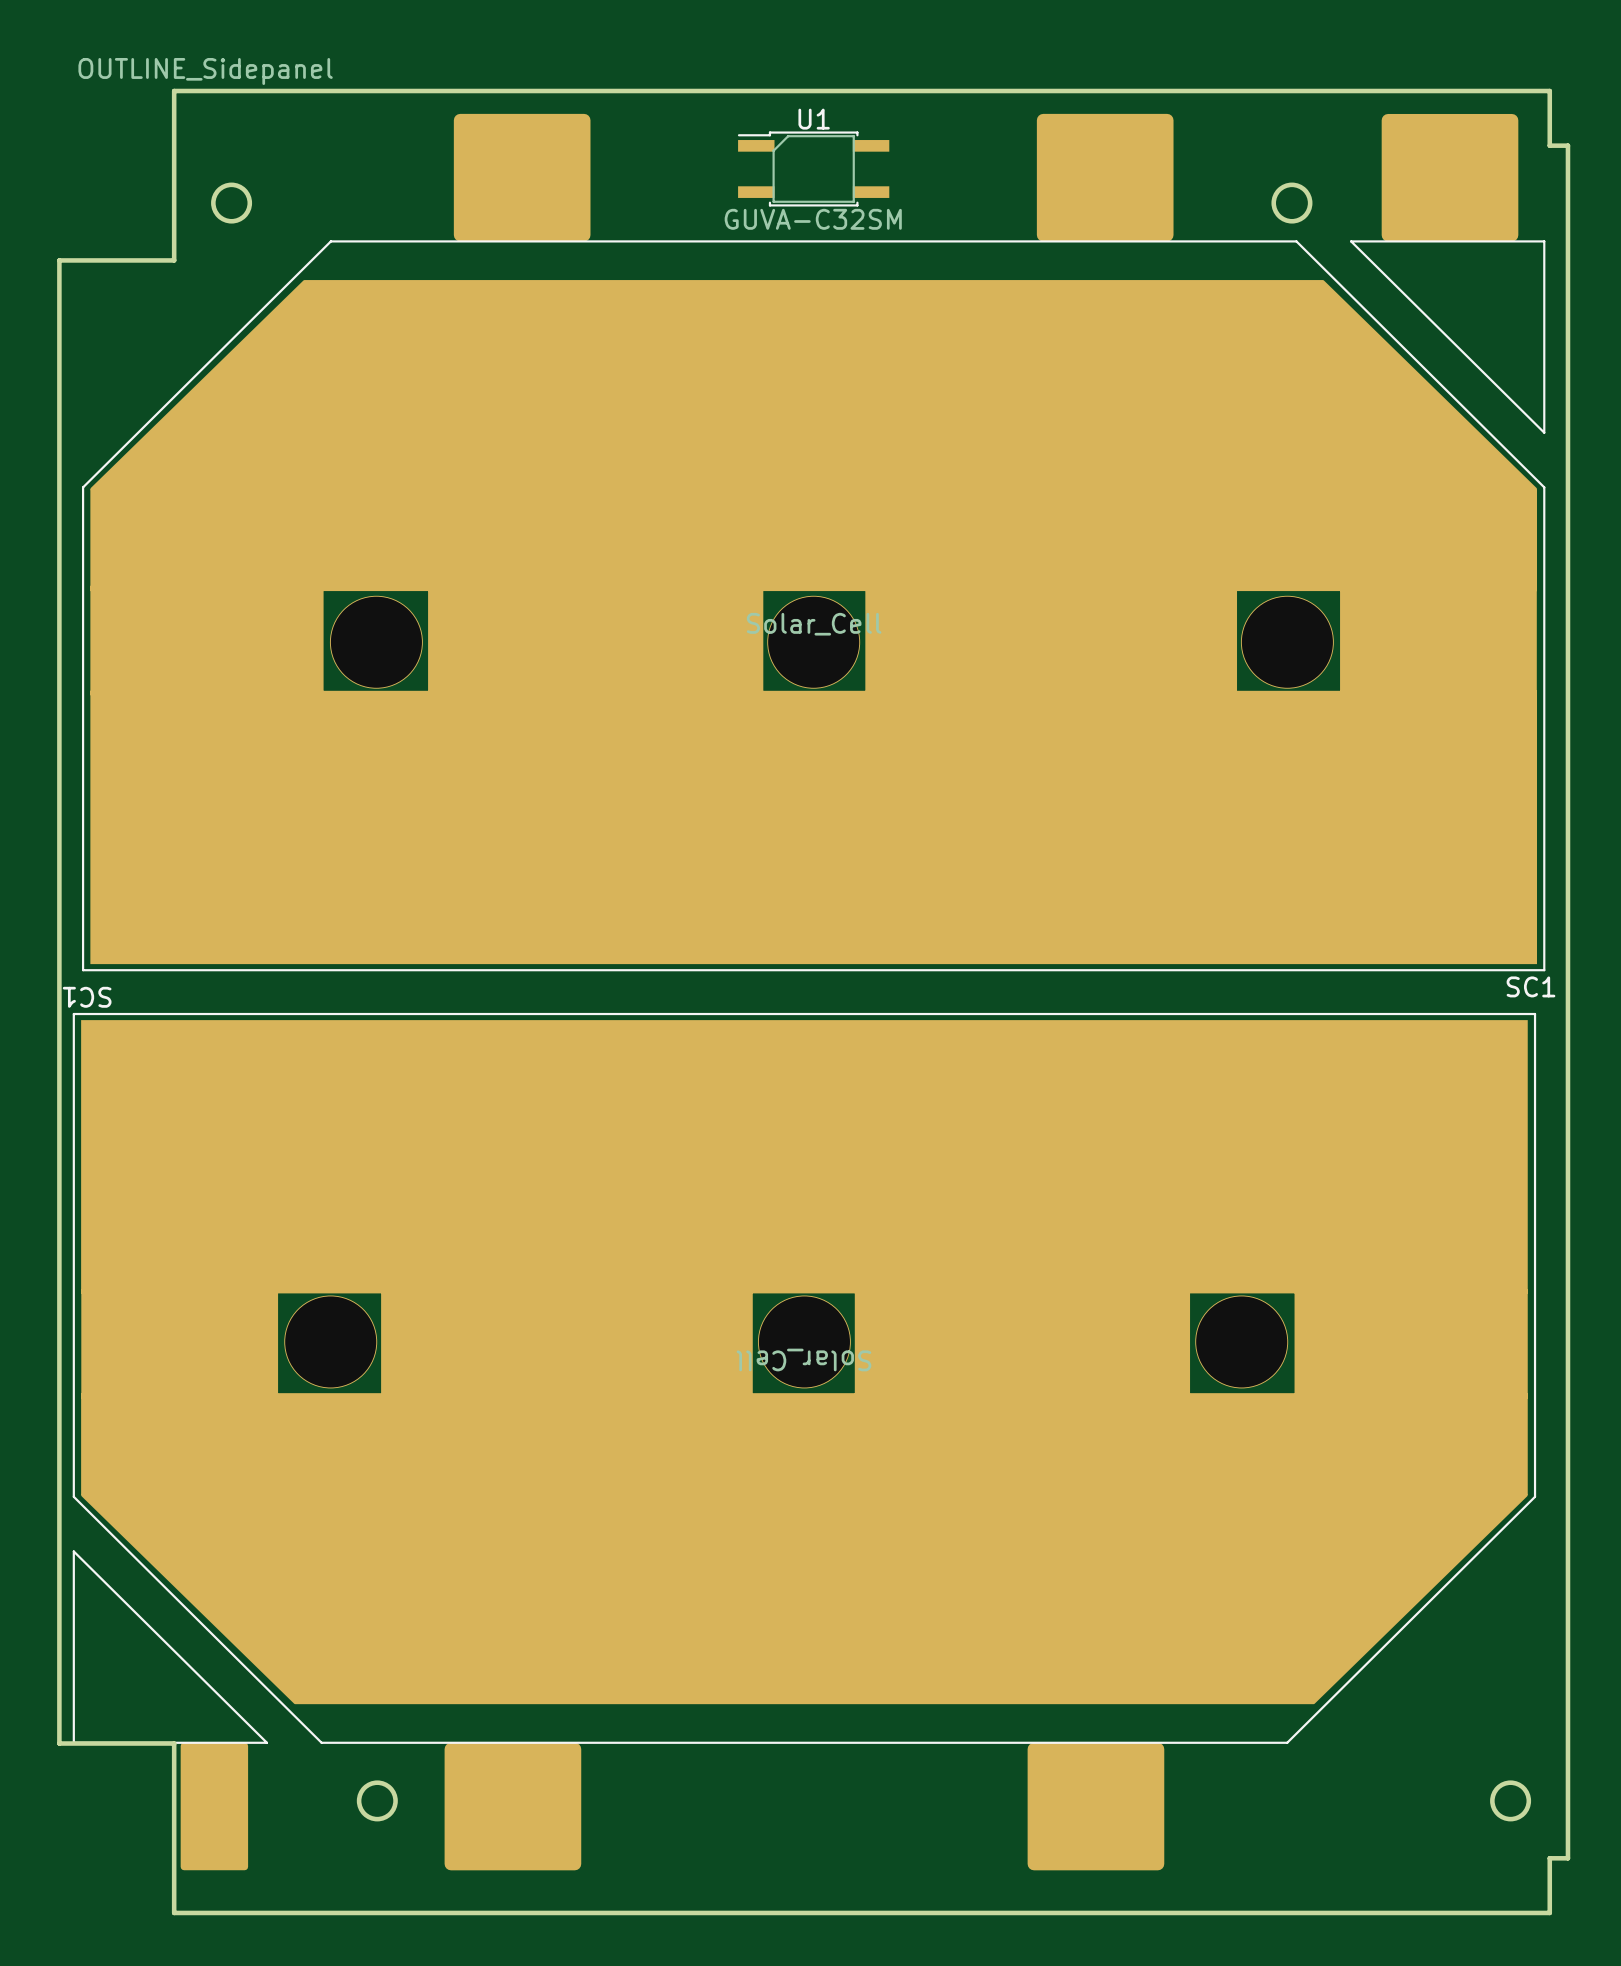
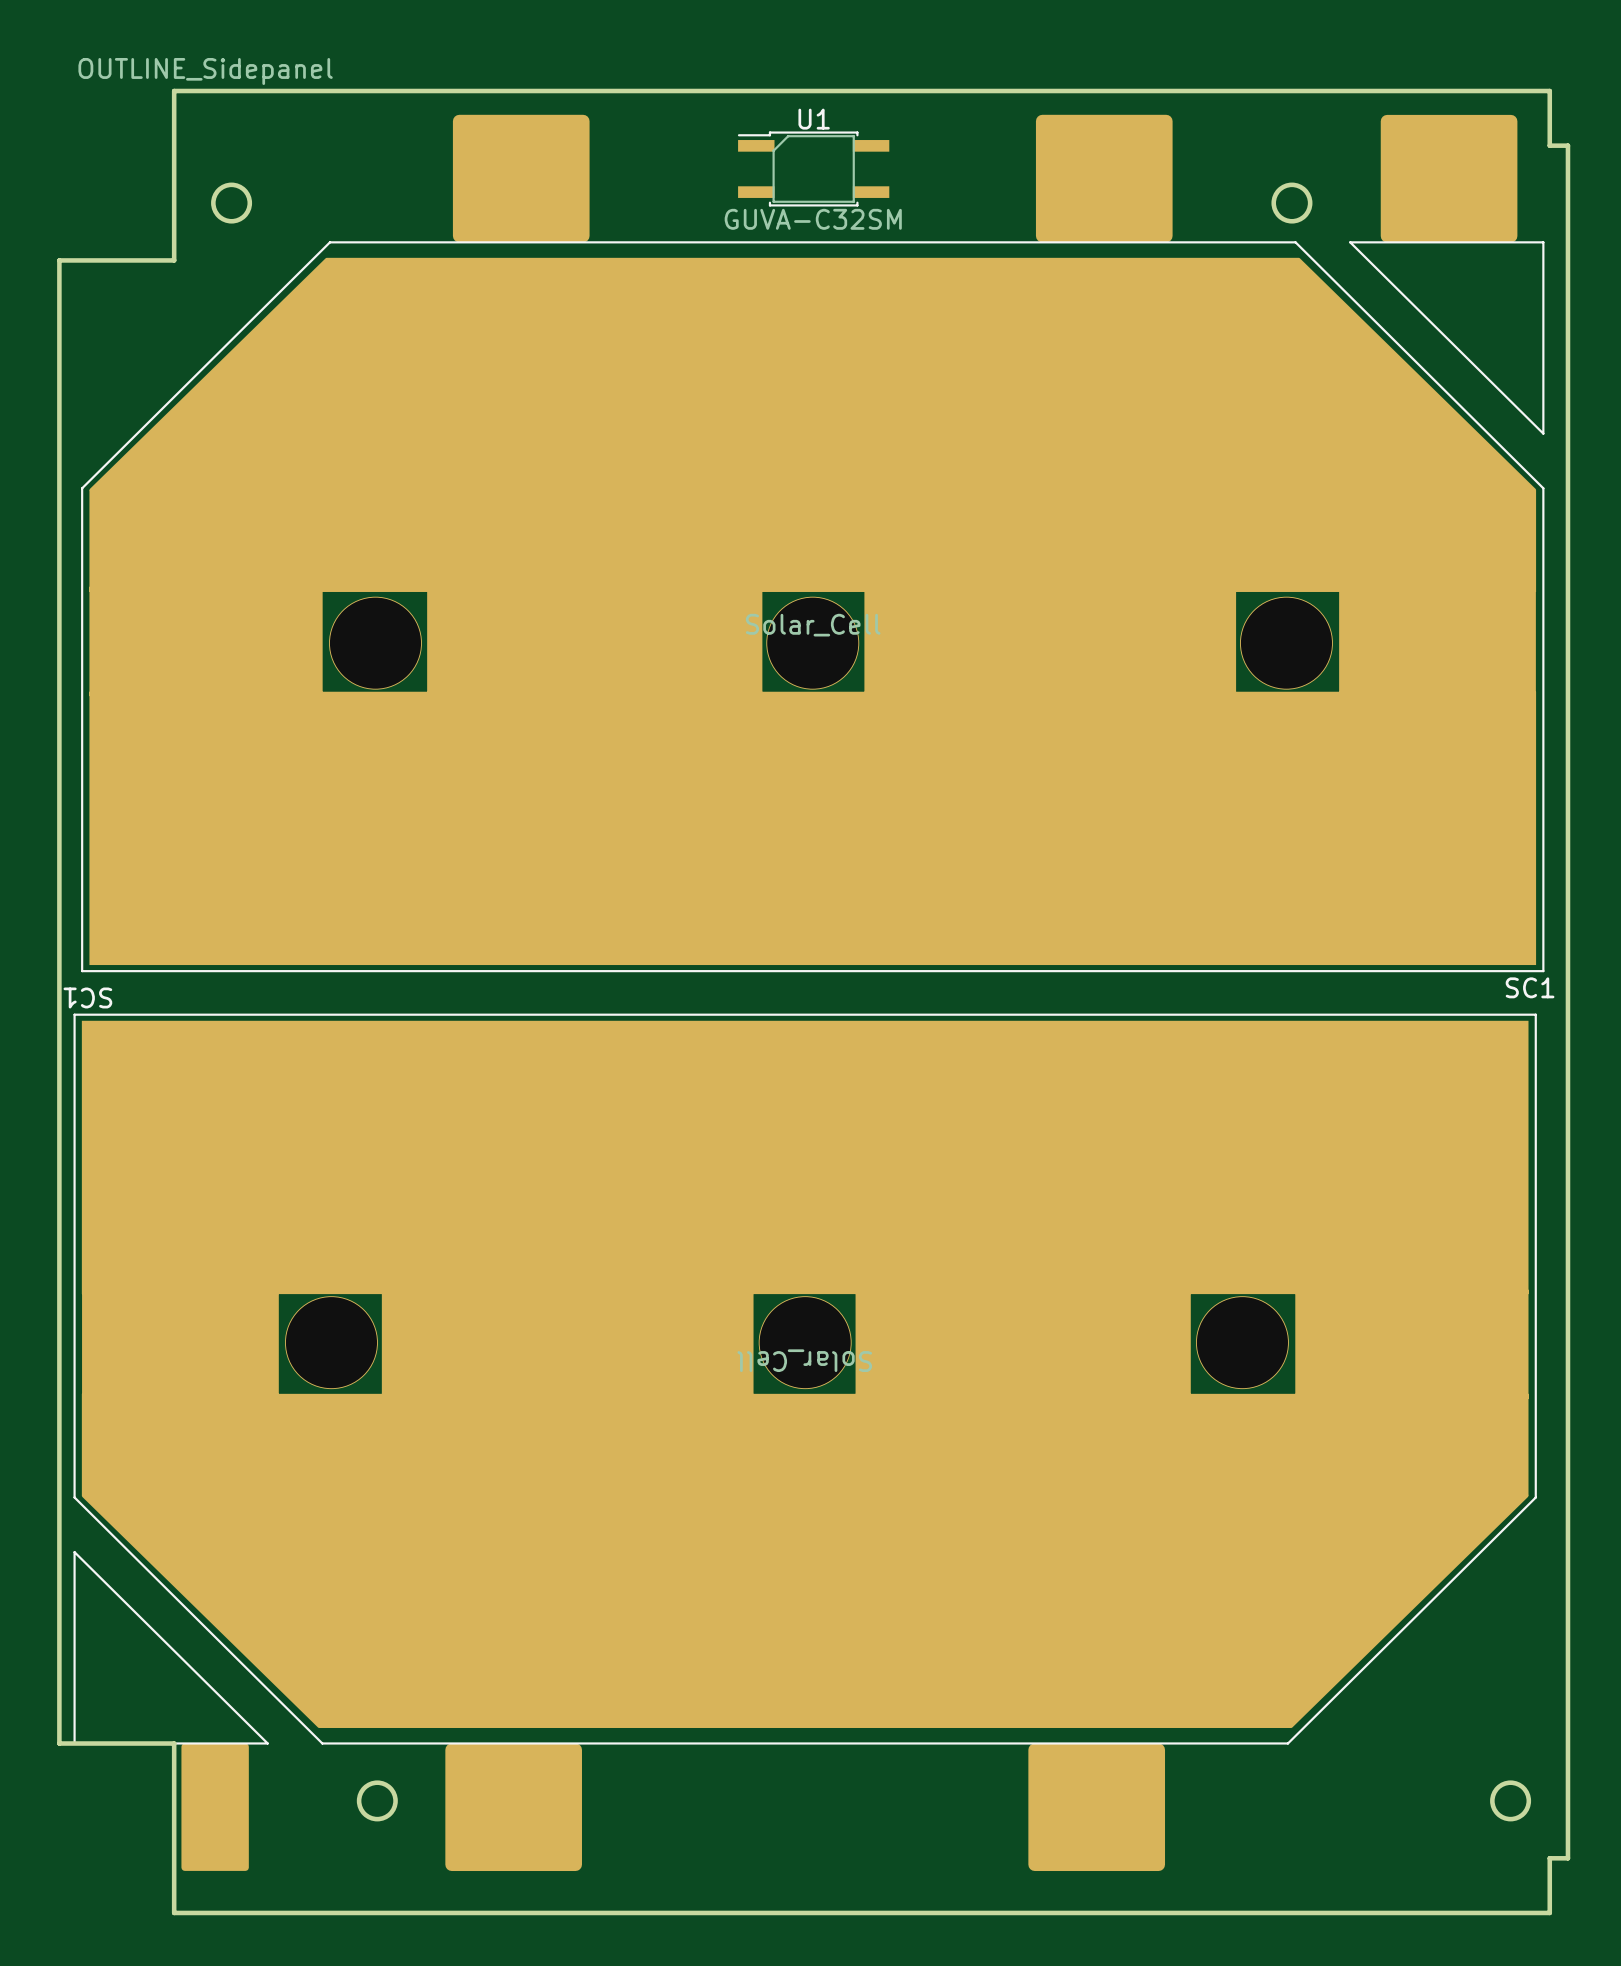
SC1 footprint: [81, 113, 1546, 972] -> [81, 114, 1545, 973]
SC1 footprint: [72, 1012, 1537, 1871] -> [73, 1013, 1537, 1872]

